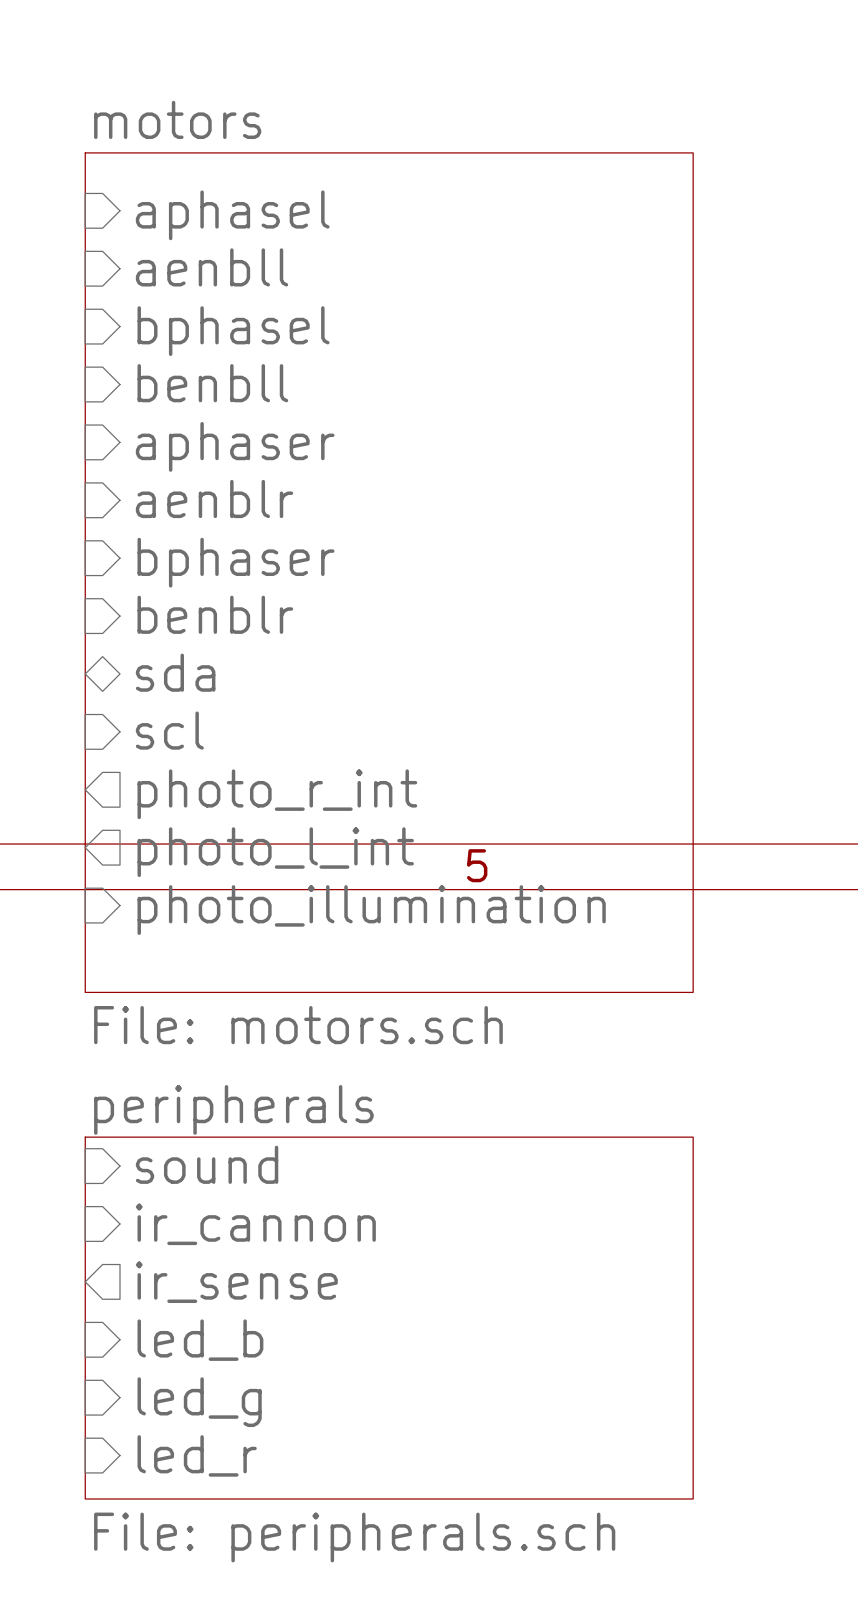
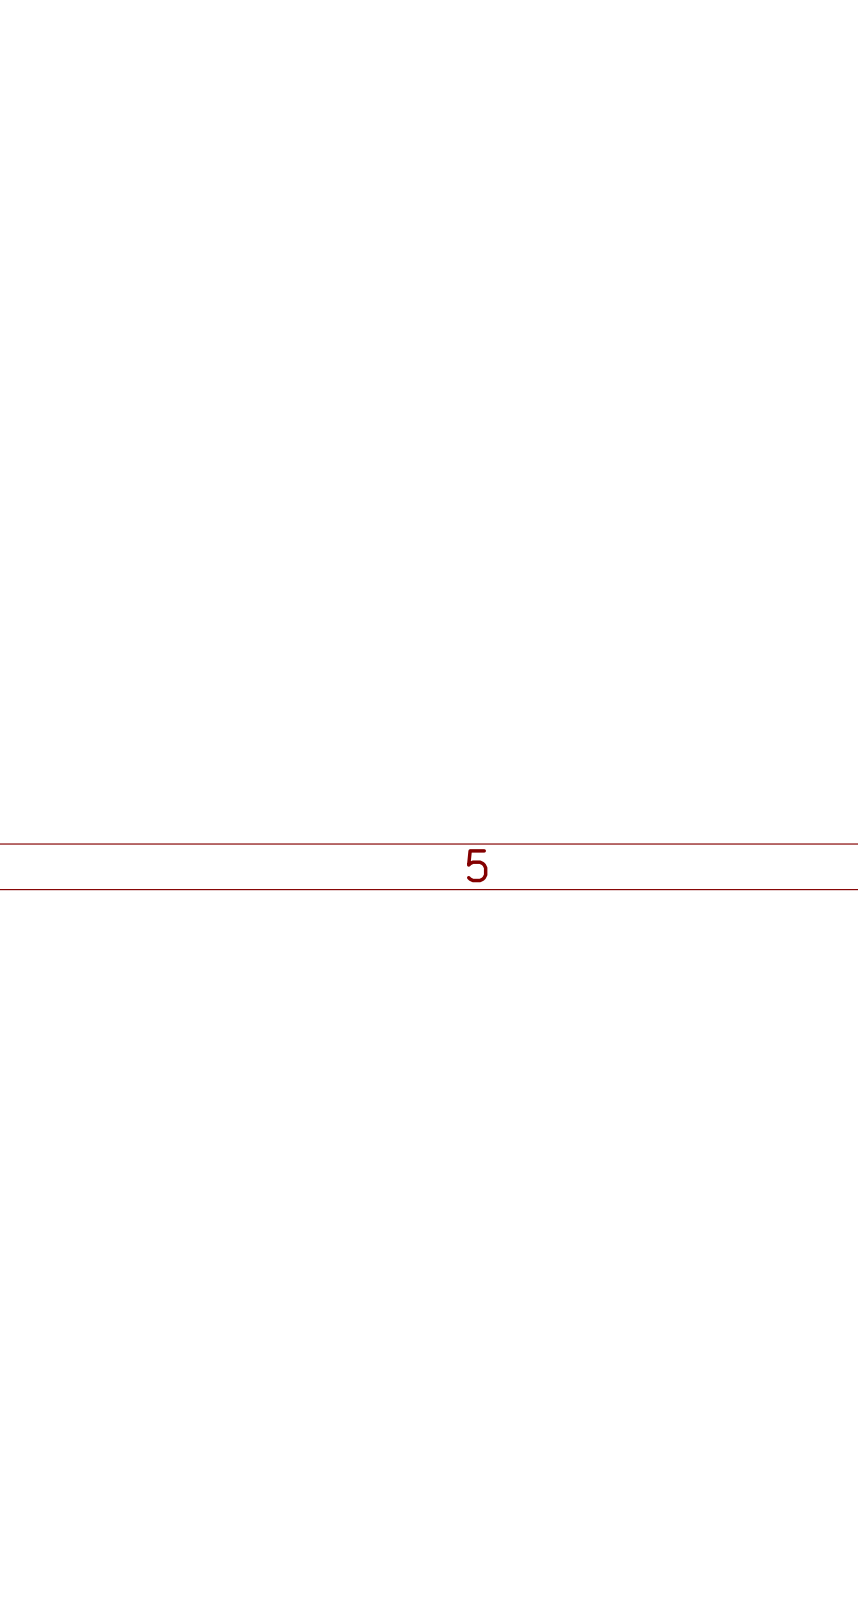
sheet pin: aphasel (232, 215) -> none
sheet pin: aenbll (212, 267) -> none
sheet pin: bphasel (233, 331) -> none
sheet pin: benbll (212, 383) -> none
sheet pin: aphaser (235, 446) -> none
sheet pin: aenblr (214, 499) -> none
sheet pin: bphaser (236, 562) -> none
sheet motors: File: motors.sch (389, 572) -> none
sheet pin: benblr (215, 614) -> none
sheet pin: sda (175, 672) -> none
sheet pin: scl (169, 730) -> none
sheet pin: photo_r_int (277, 794) -> none
sheet pin: photo_l_int (275, 852) -> none
sheet pin: photo_illumination (371, 910) -> none
sheet pin: sound (207, 1164) -> none
sheet pin: ir_cannon (255, 1224) -> none
sheet pin: ir_sense (236, 1282) -> none
sheet peripherals: File: peripherals.sch (389, 1318) -> none
sheet pin: led_b (200, 1340) -> none
sheet pin: led_g (199, 1402) -> none
sheet pin: led_r (197, 1455) -> none

